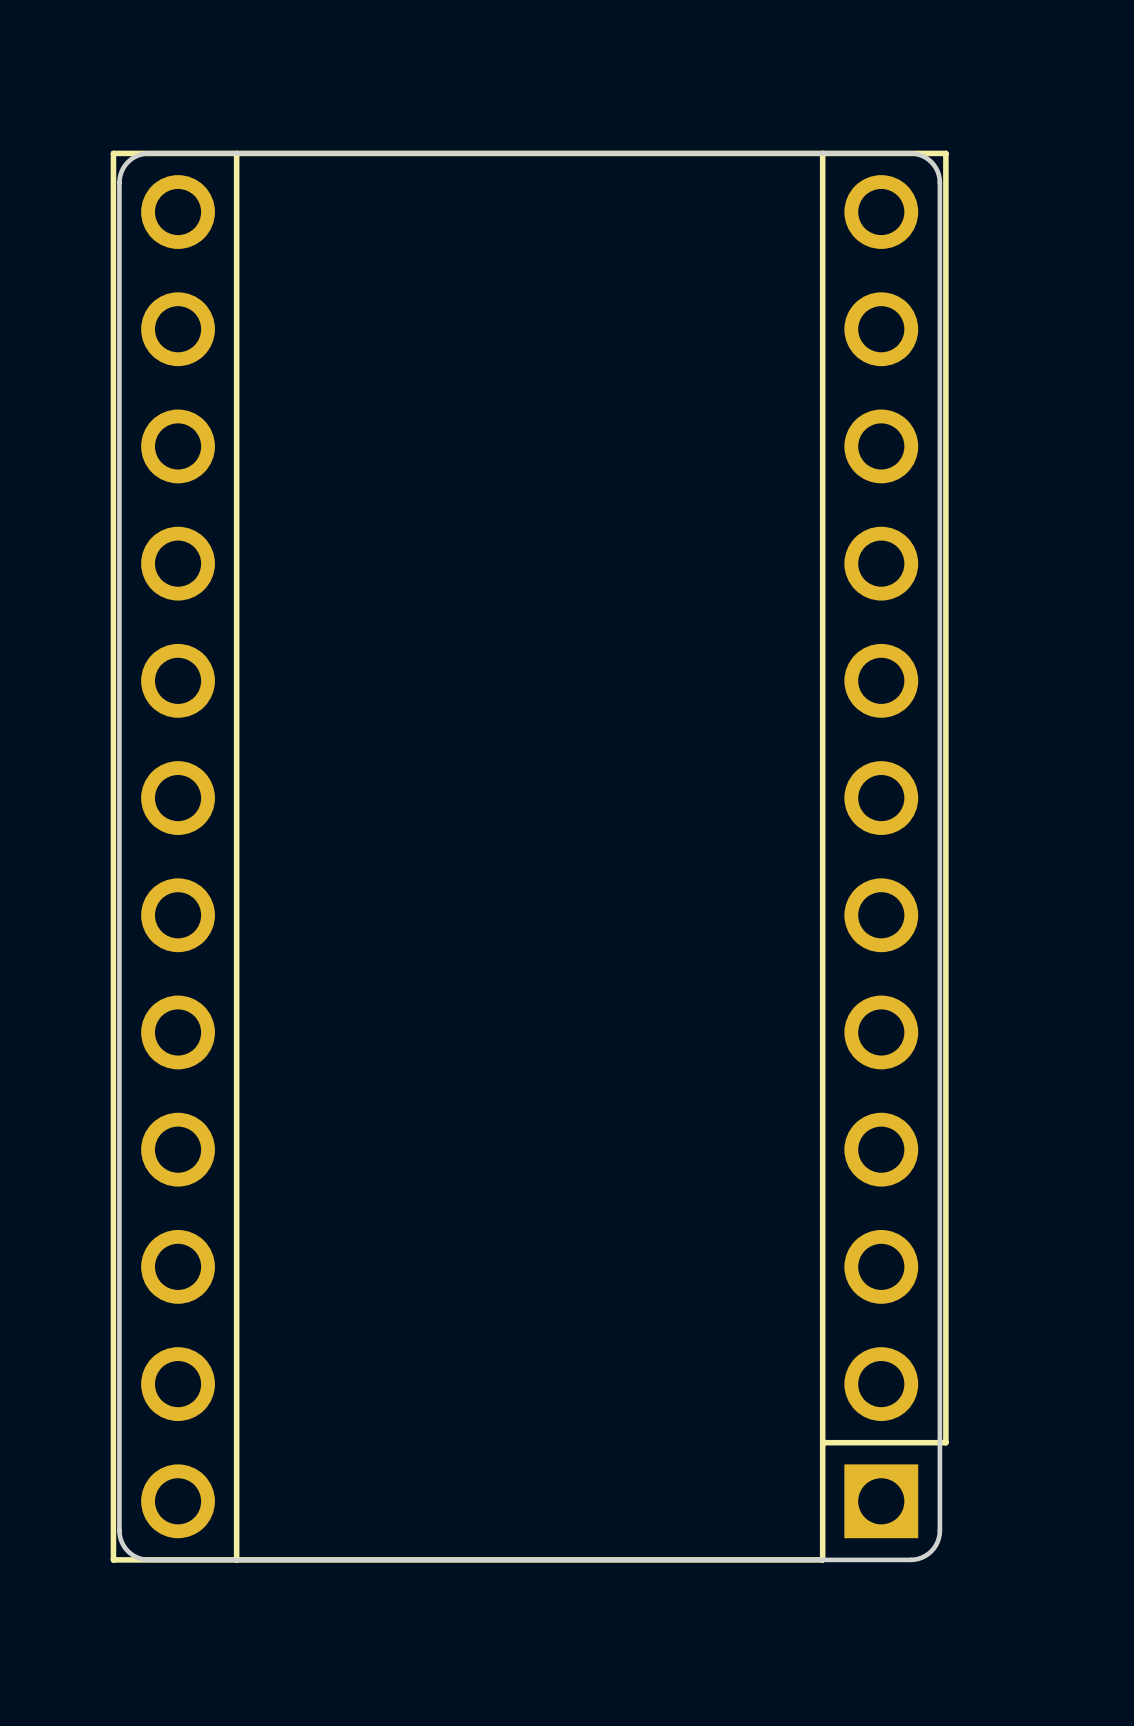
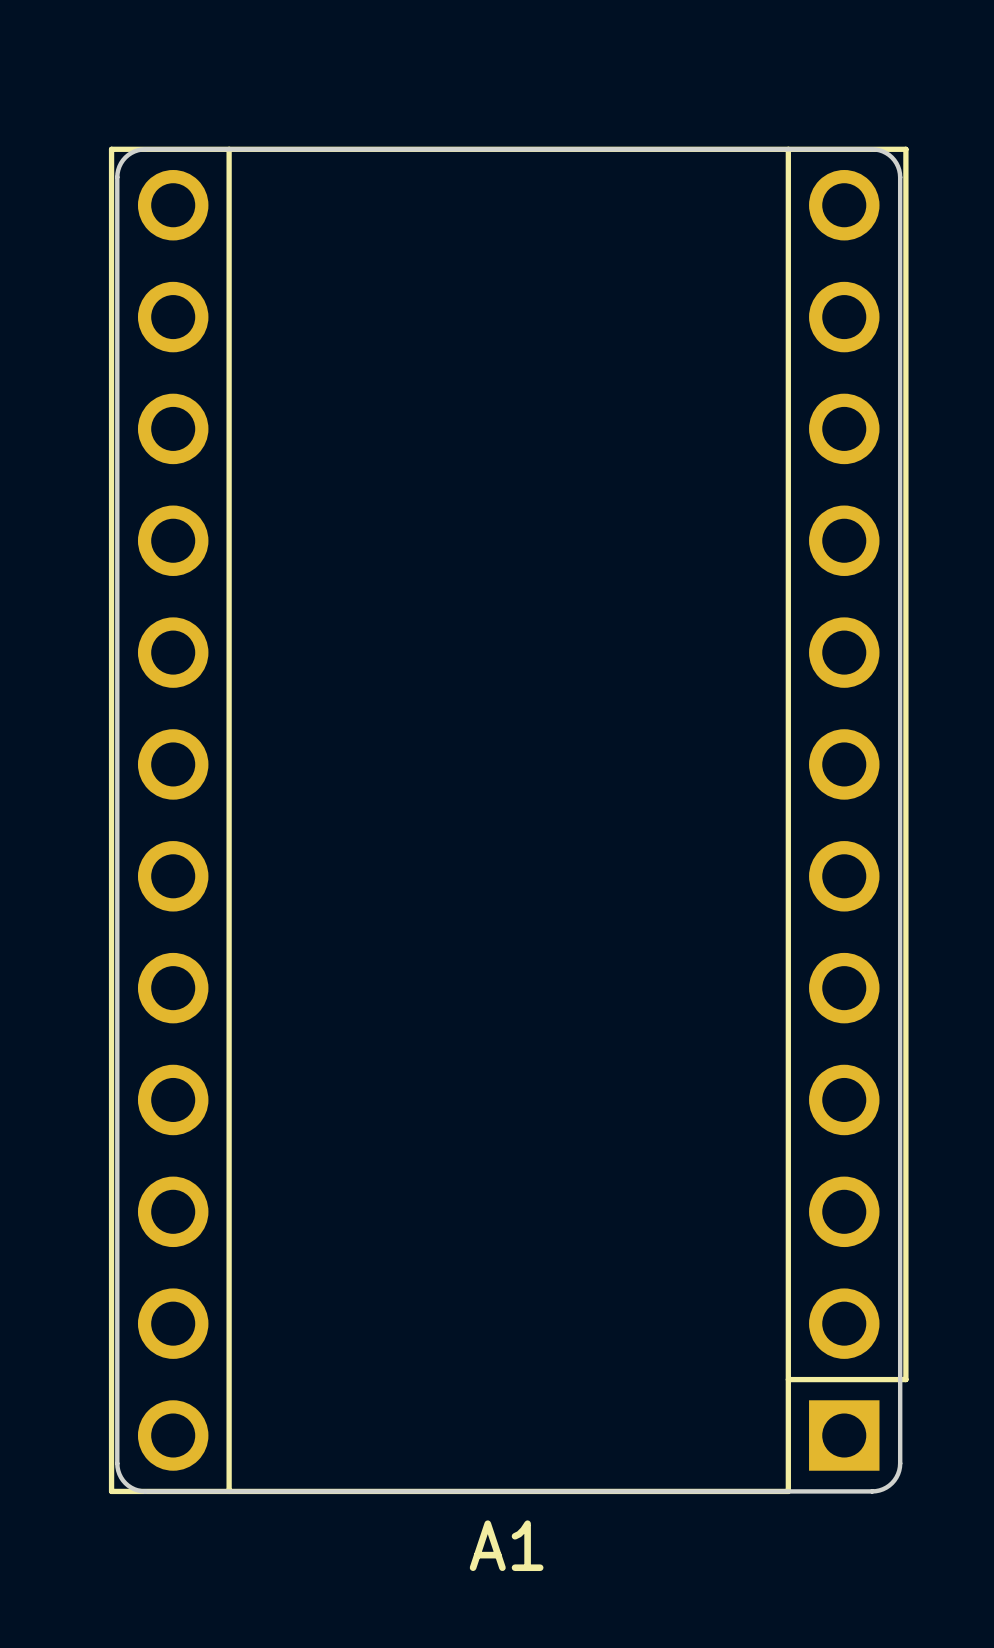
A1 name: none -> A1 (506, 1545)

